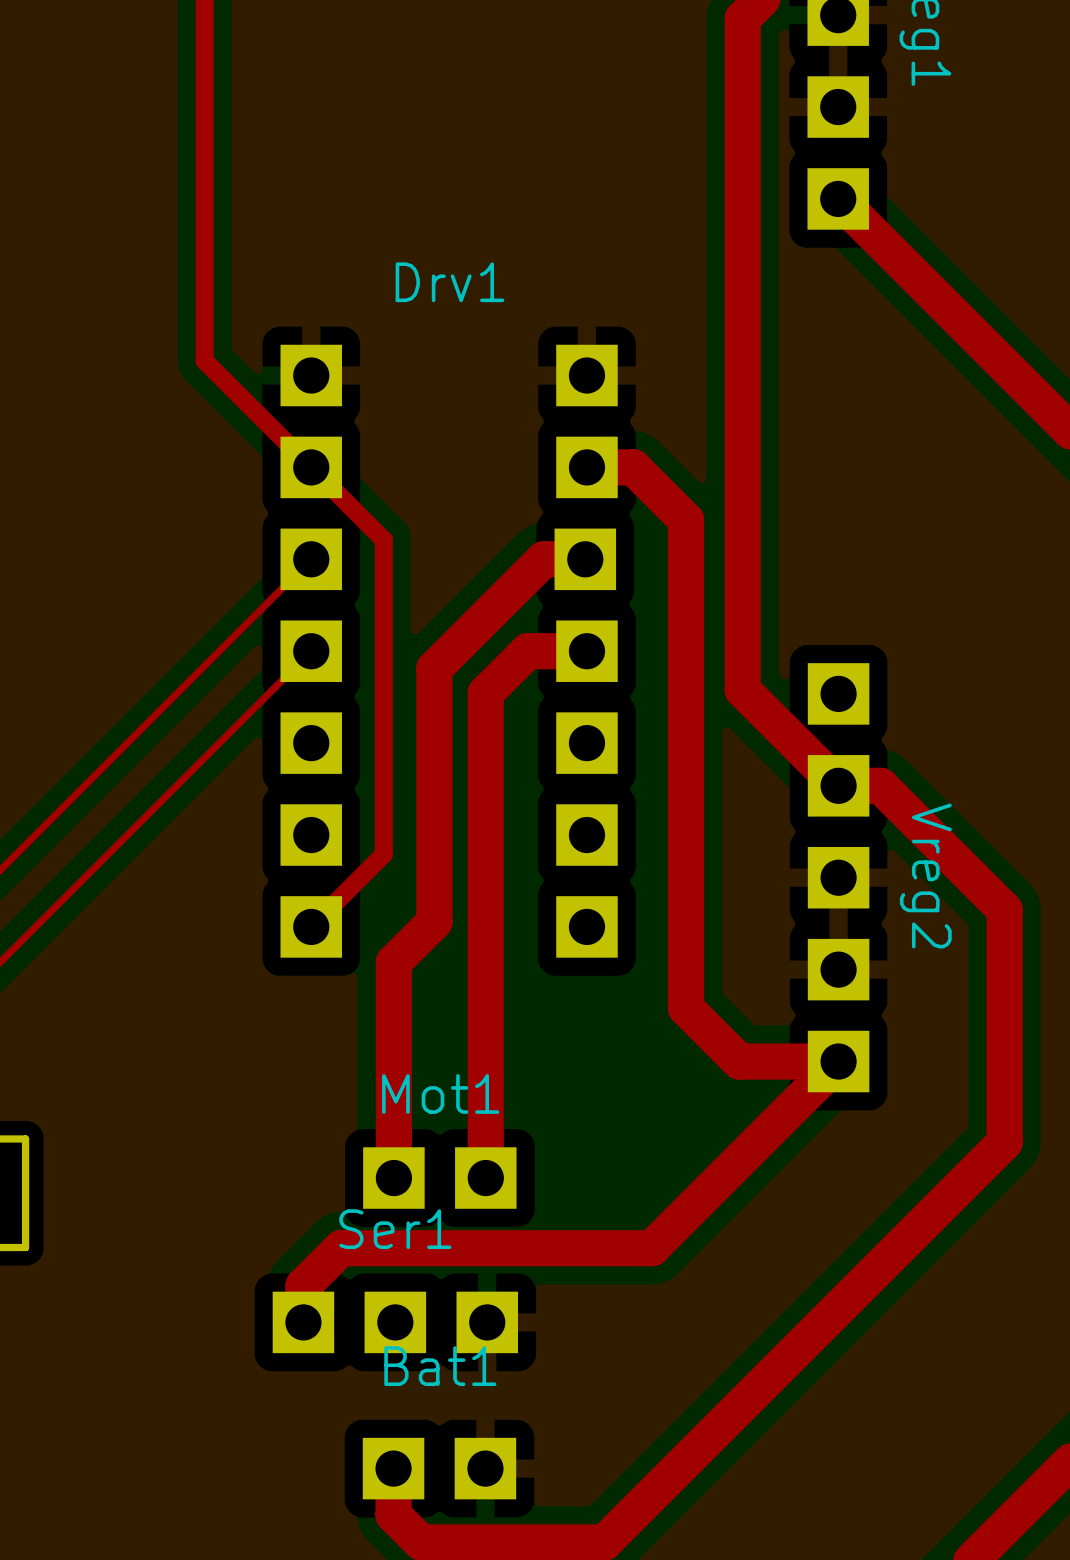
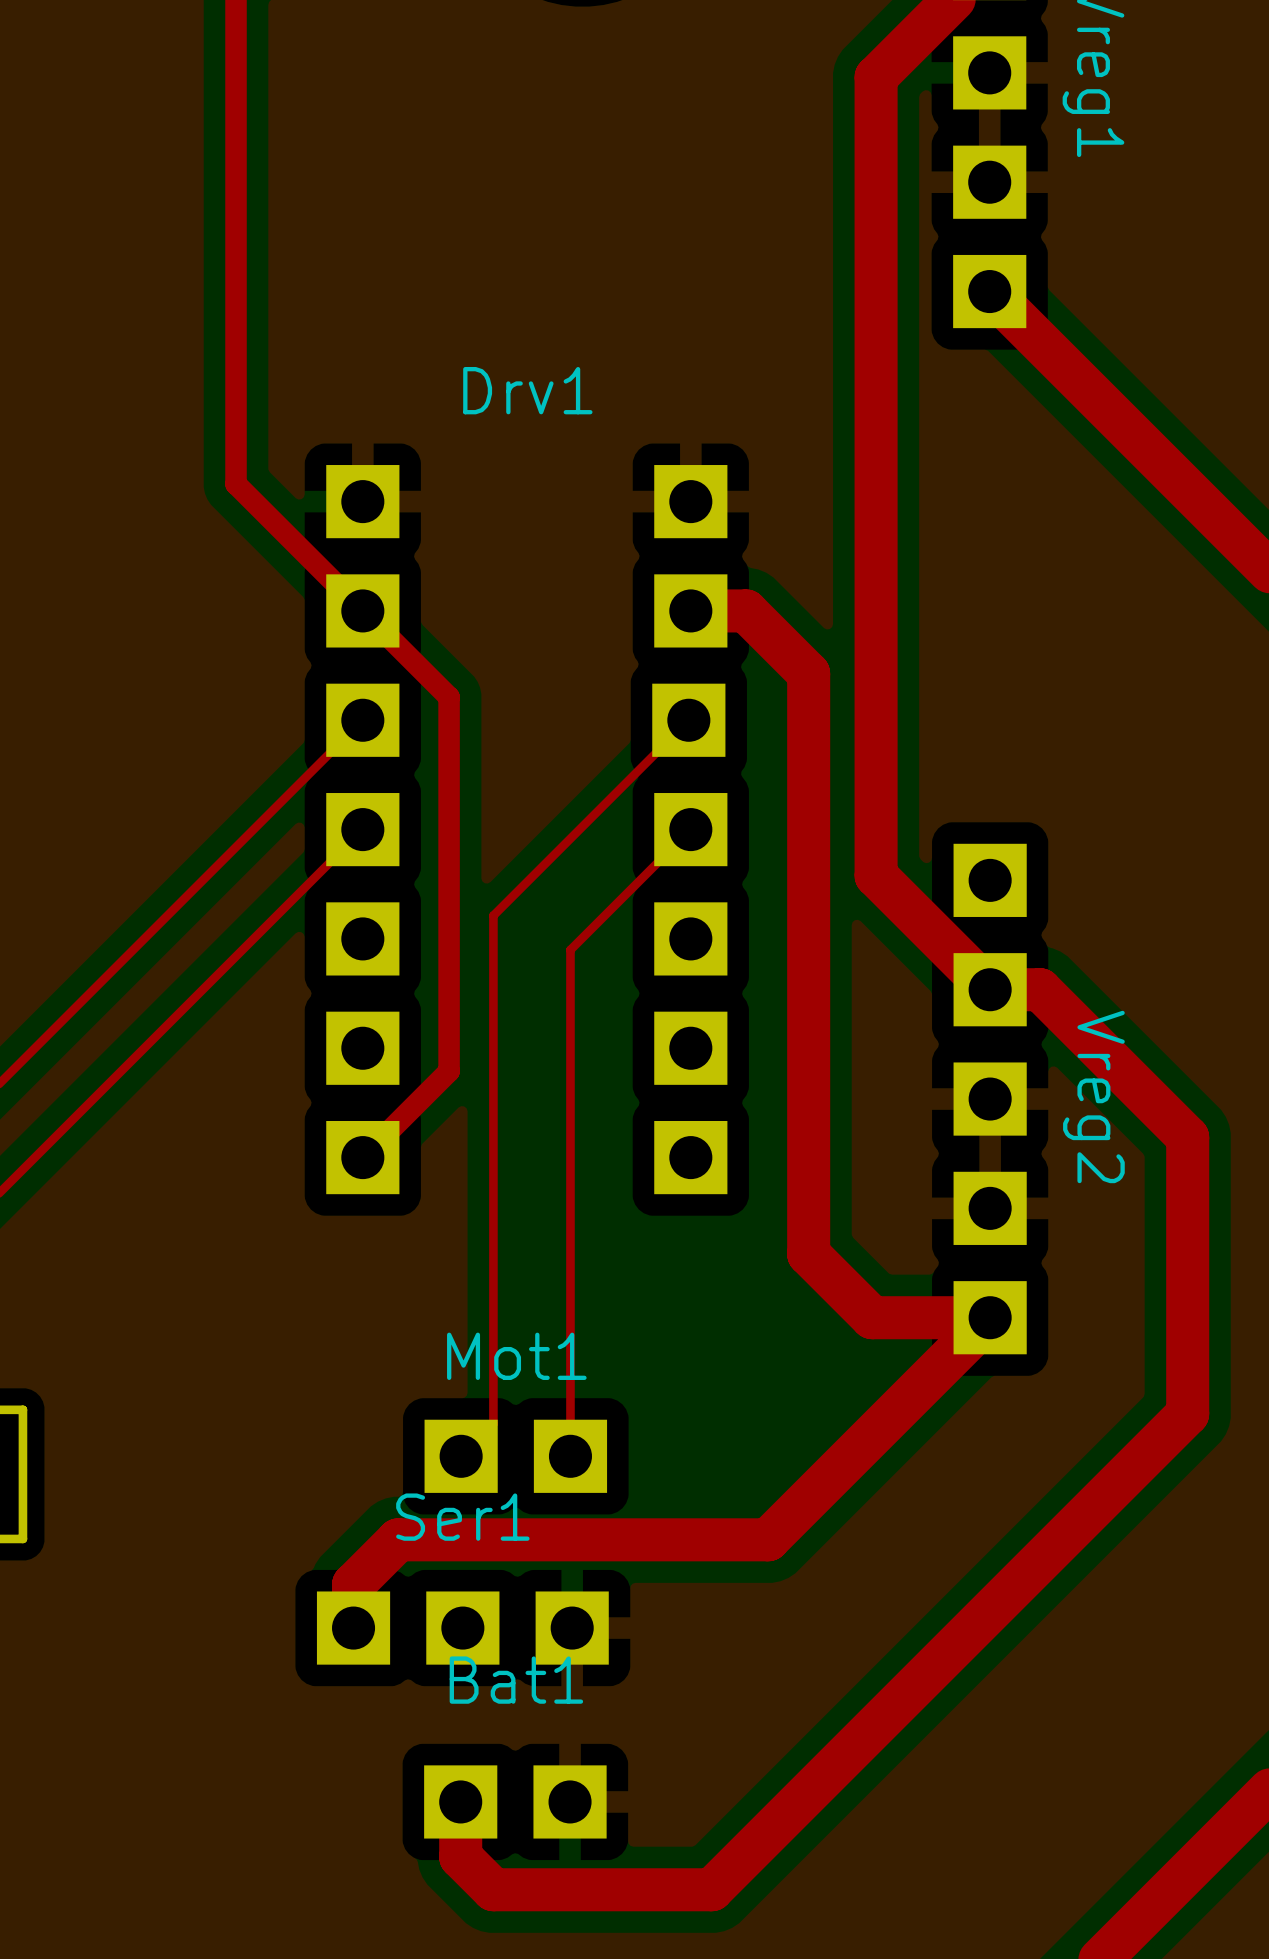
top track: (585, 559) (543, 559) (434, 668) (434, 921) (393, 962) (393, 1178) -> (688, 720) (493, 915) (493, 1424)
top track: (586, 651) (527, 651) (485, 693) (485, 752) -> (690, 829) (570, 949)
top track width: thick (485, 752) (485, 1178) -> thin (570, 949) (570, 1456)

